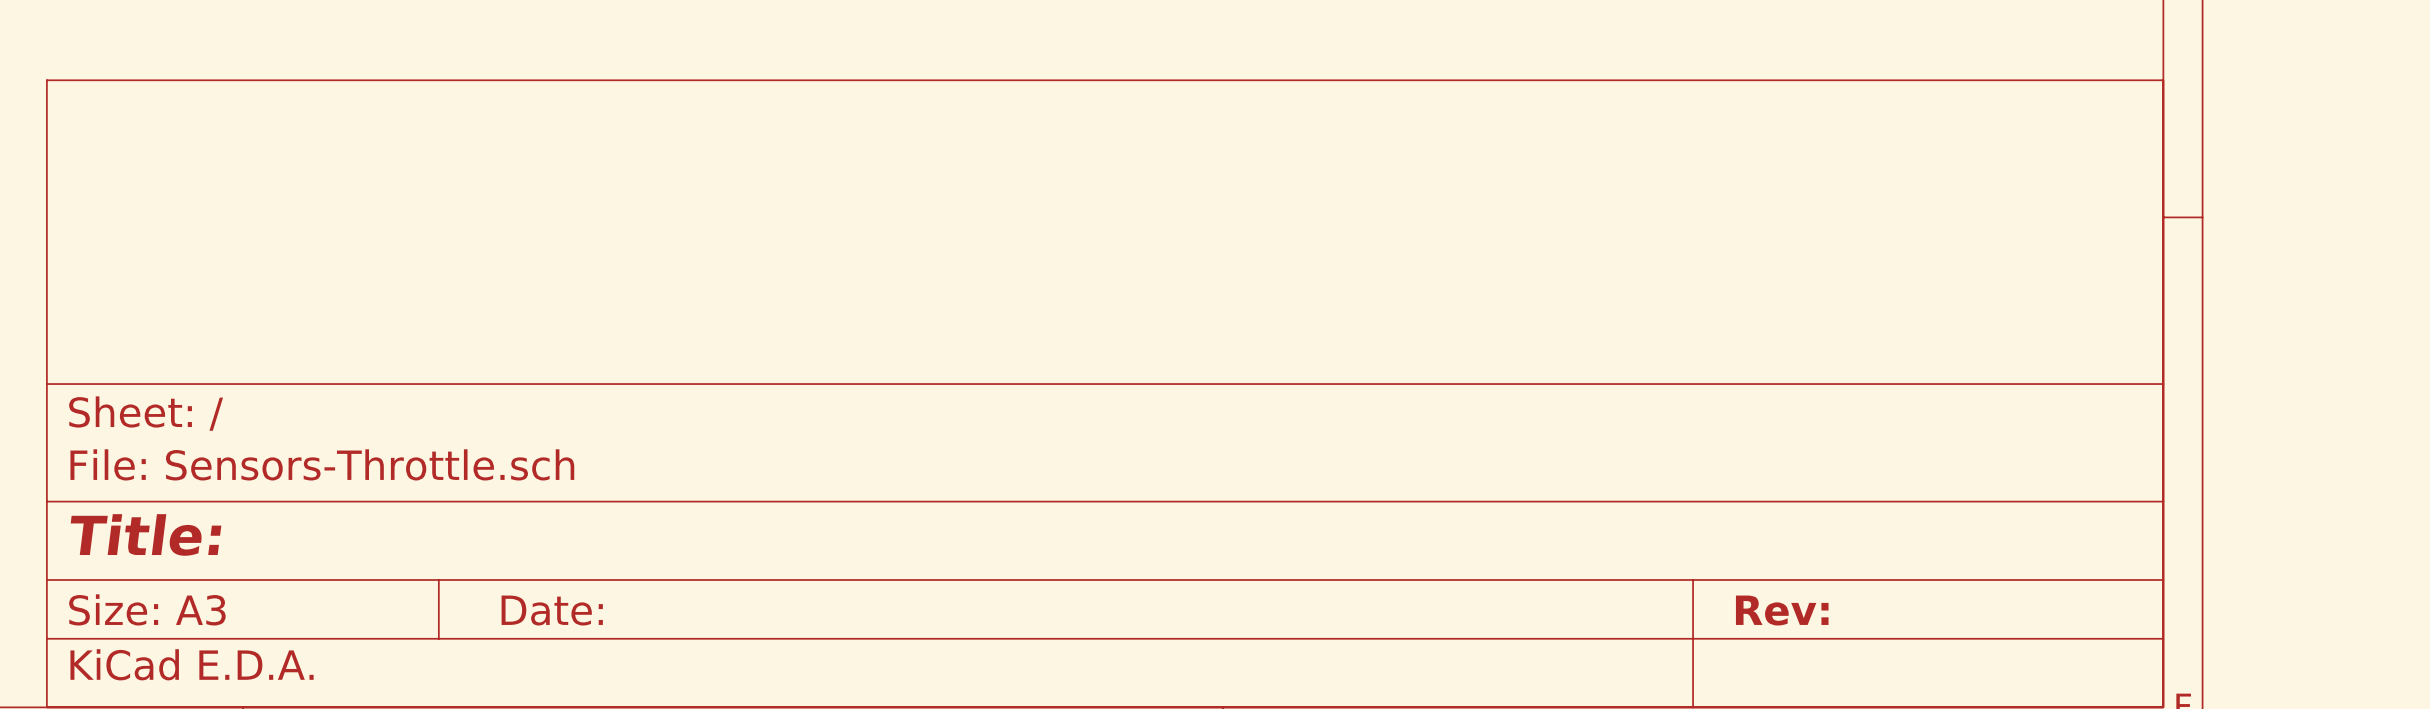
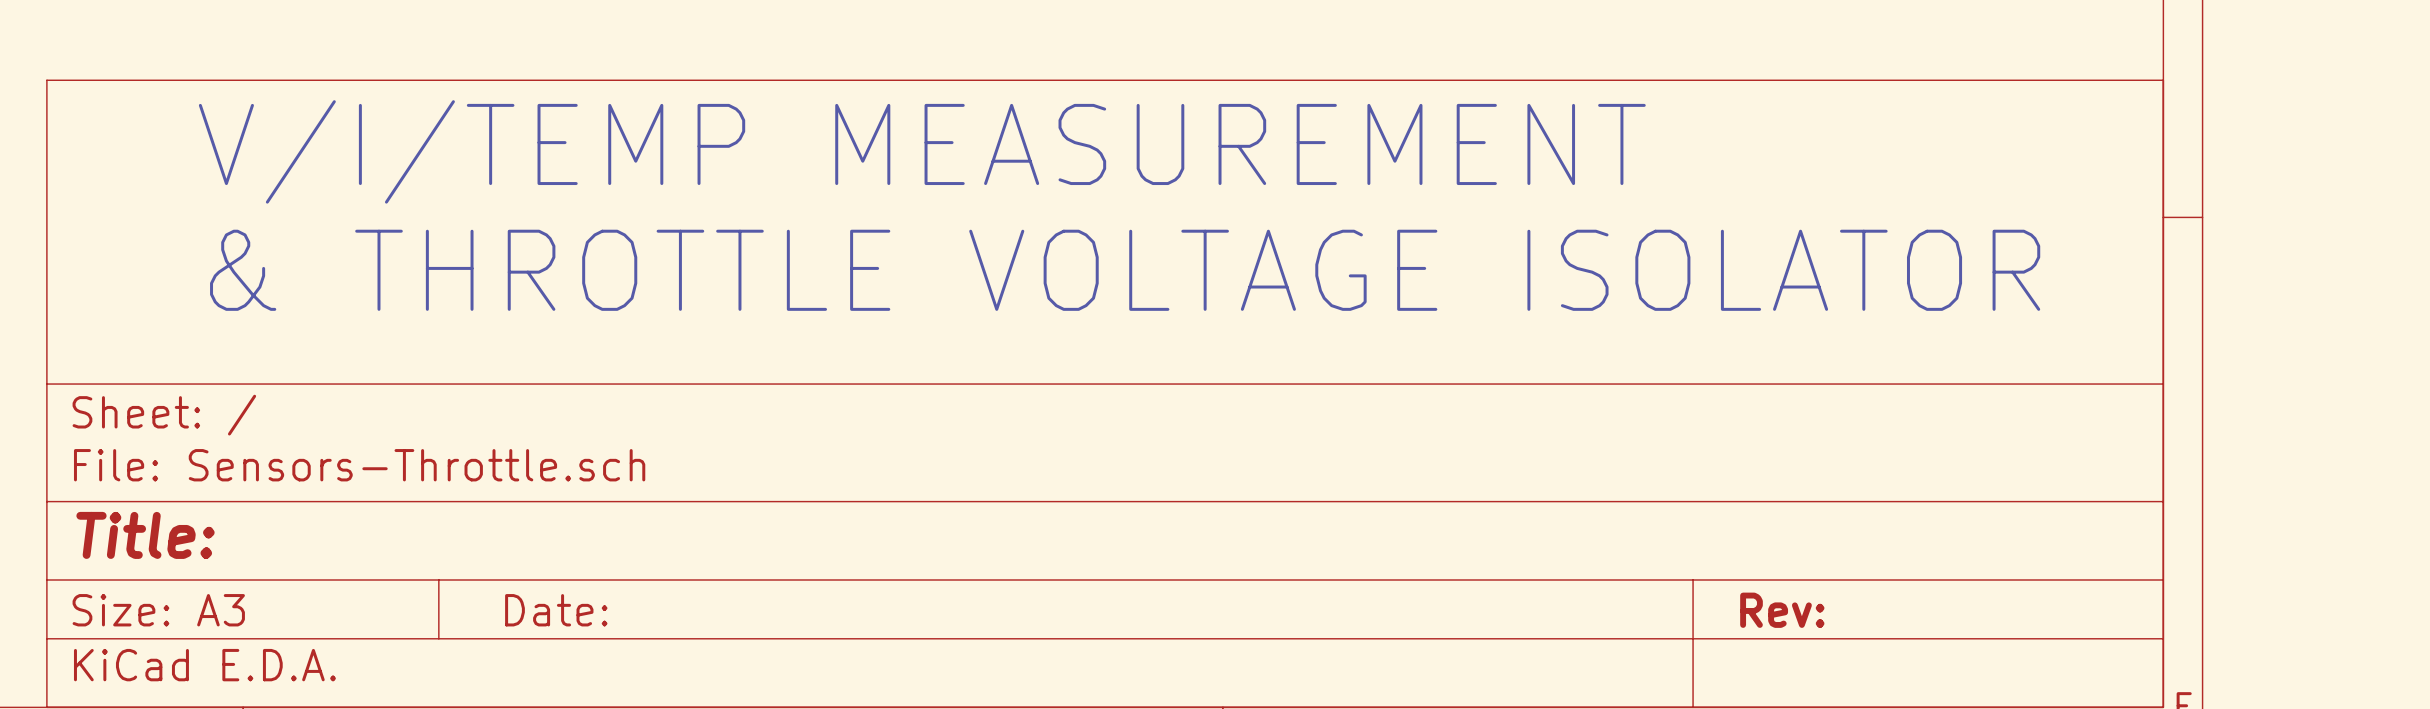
text: none -> V/I/TEMP MEASUREMENT (922, 151)
text: none -> & THROTTLE VOLTAGE ISOLATOR (1125, 270)

